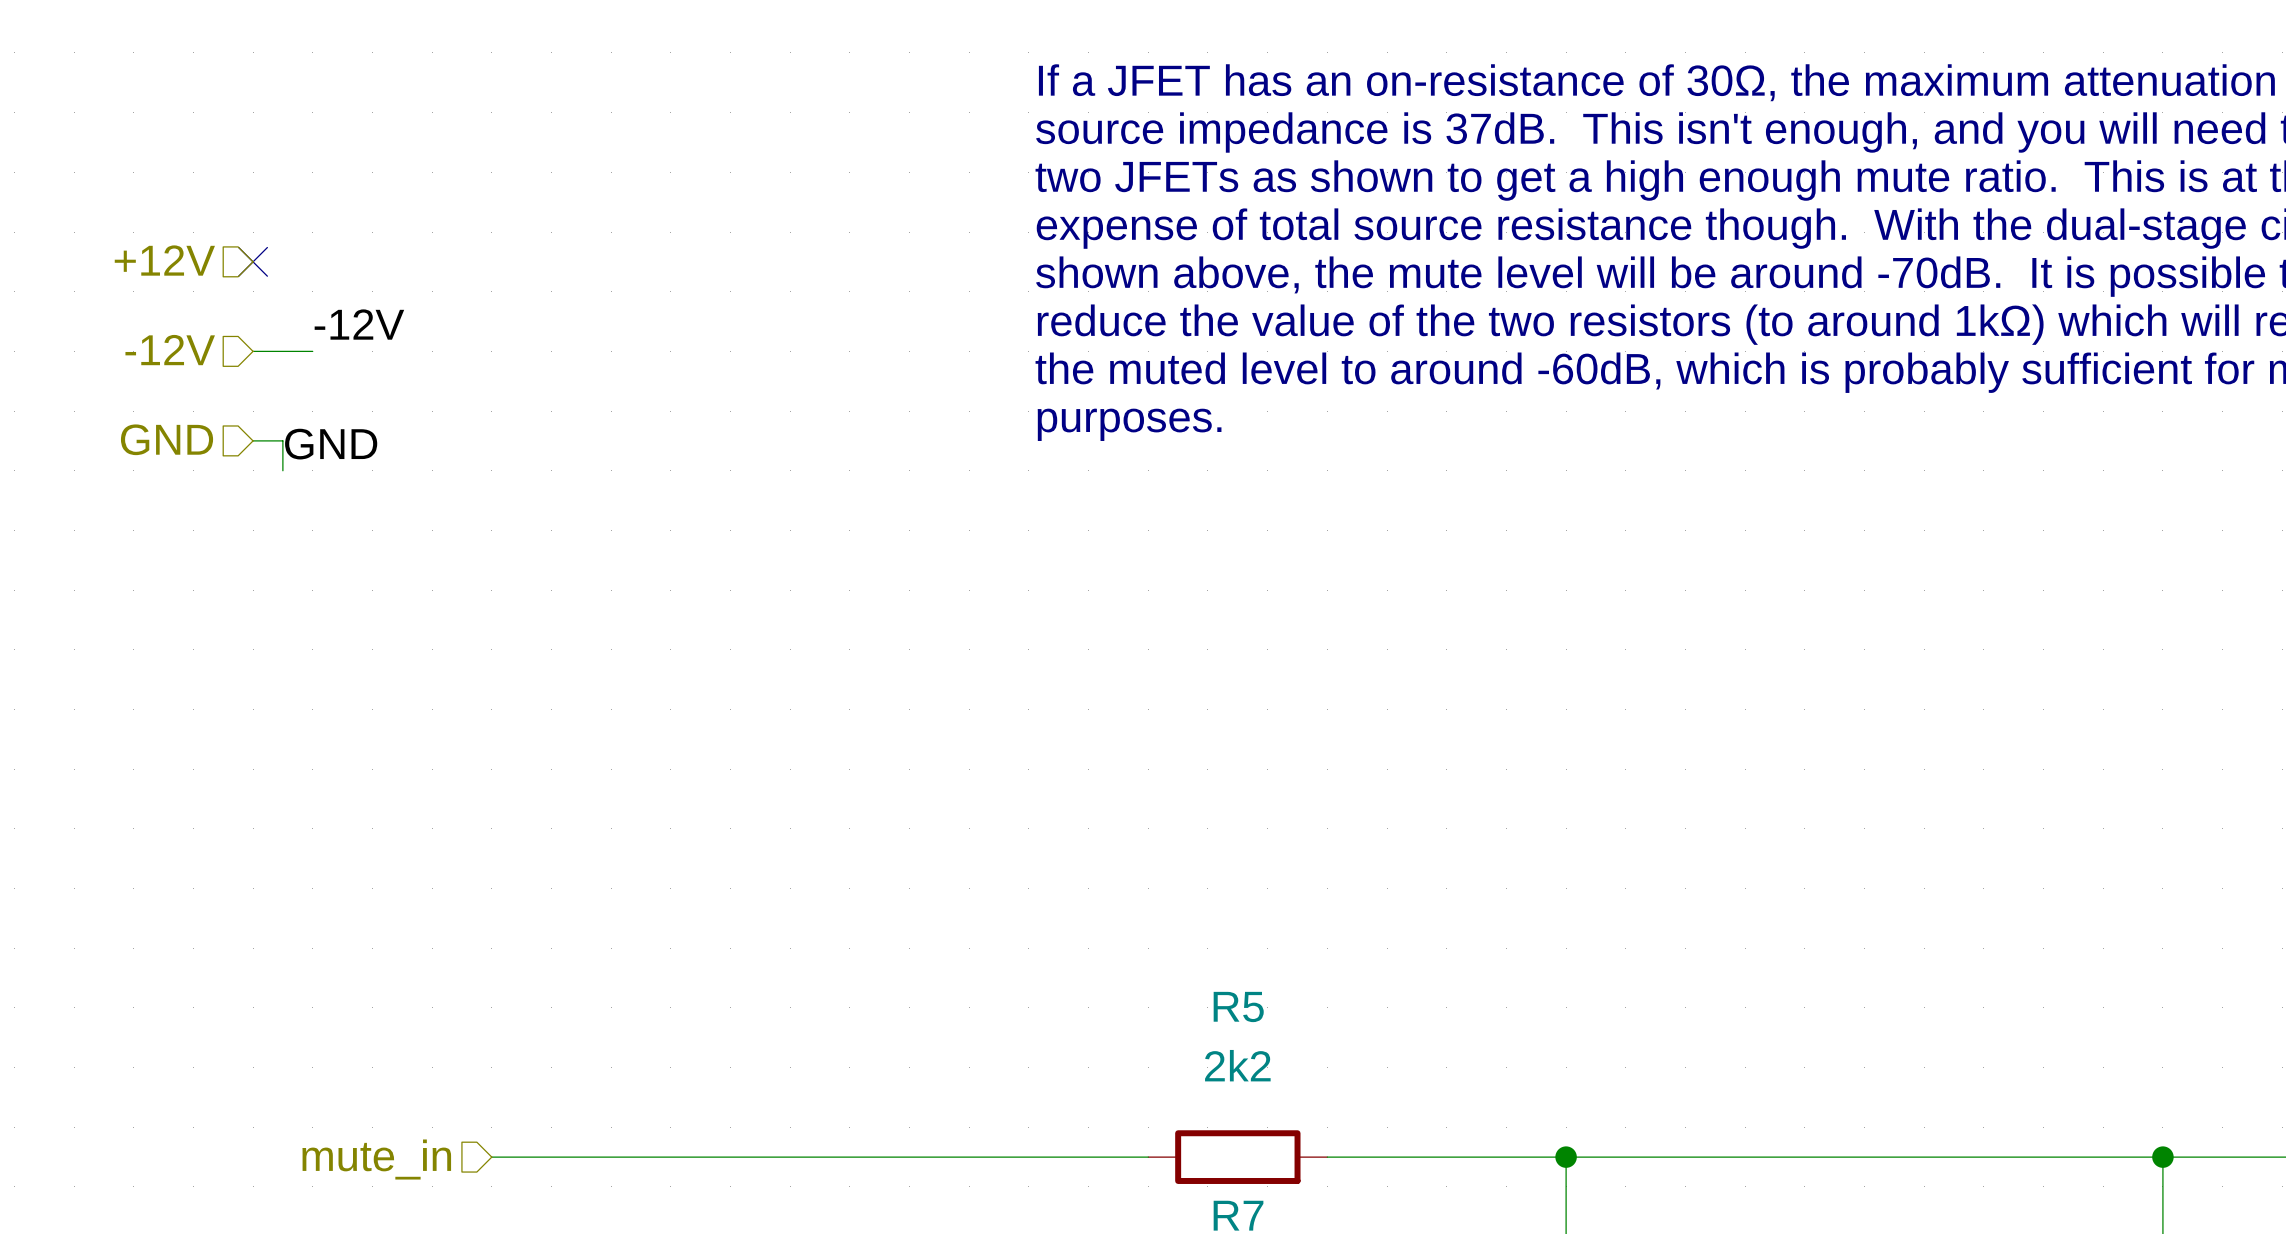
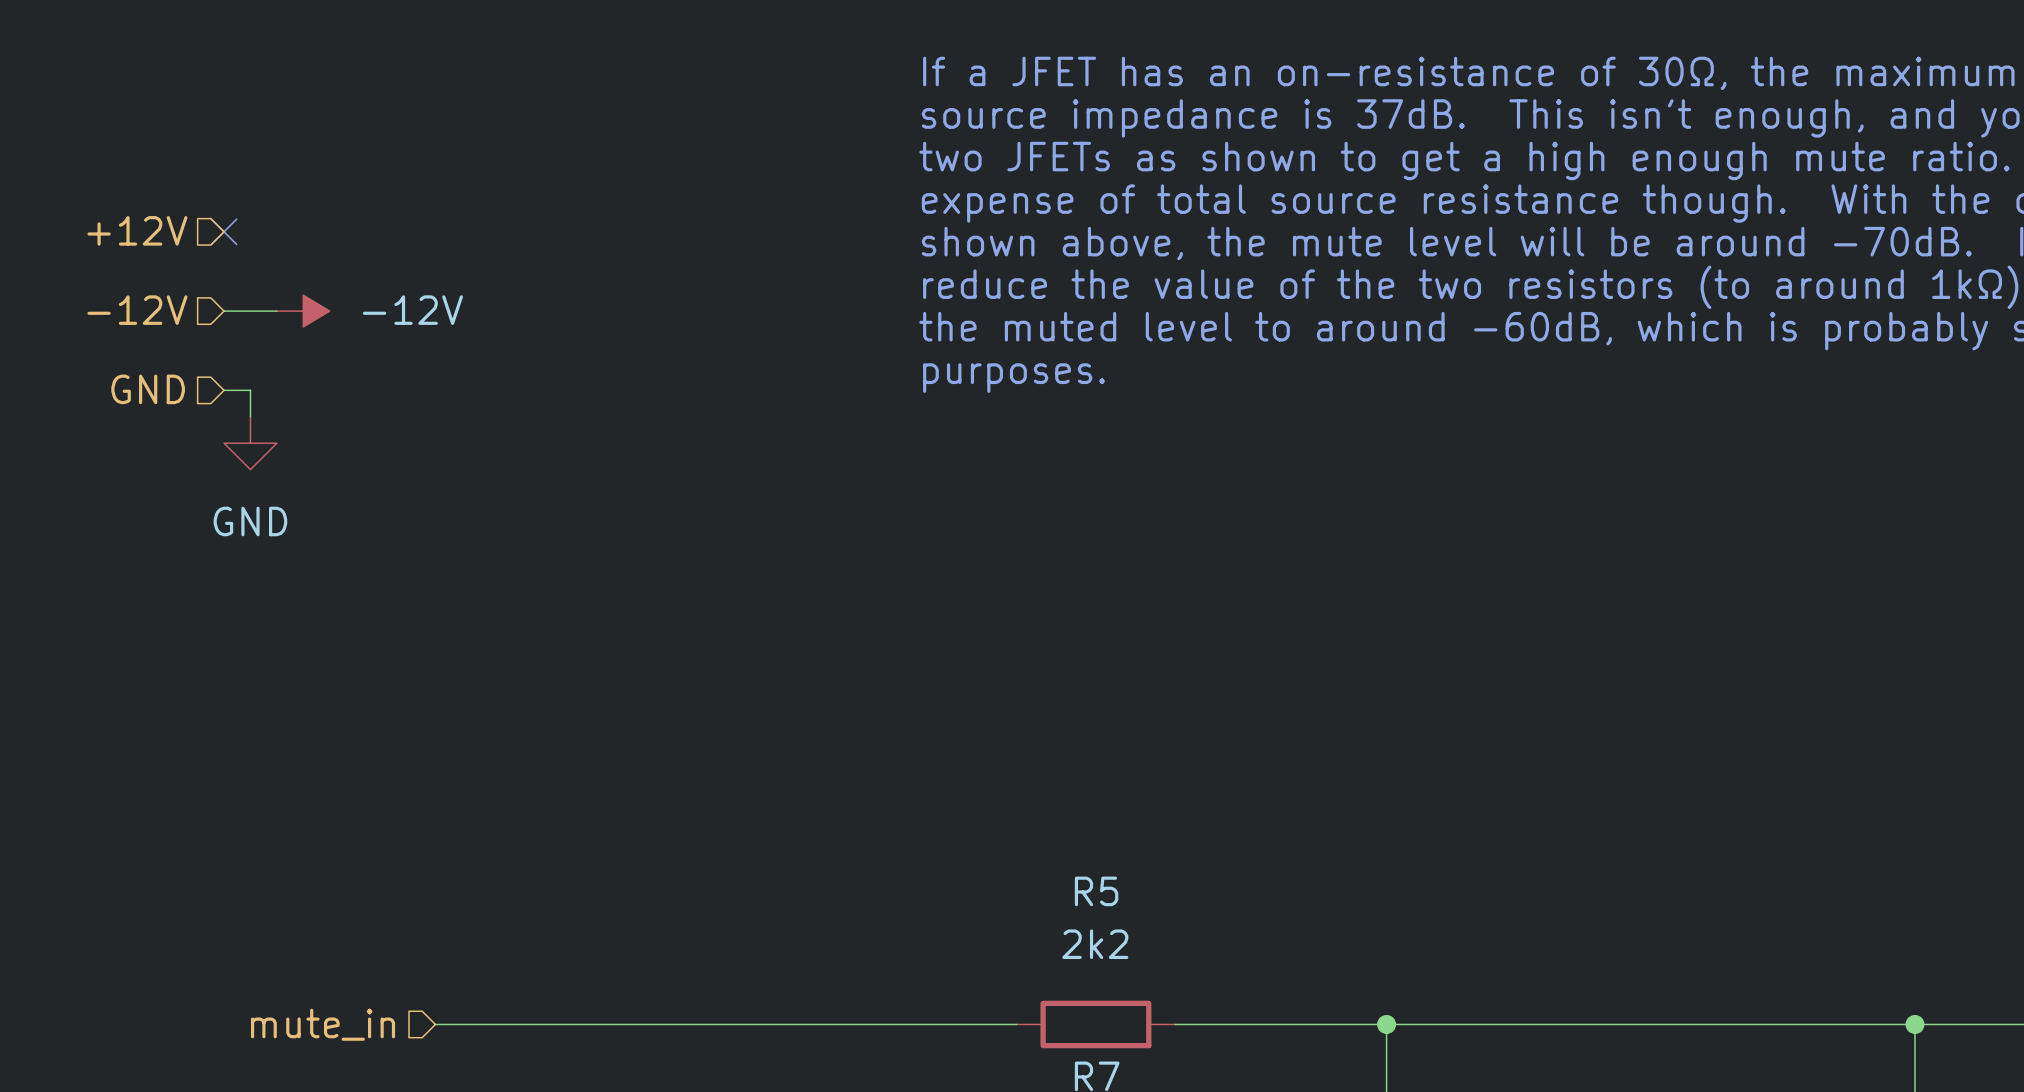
label: -12V (359, 324) -> none
power symbol: none -> -12V (303, 311)
label: GND (331, 444) -> none
power symbol: none -> GND (250, 443)

